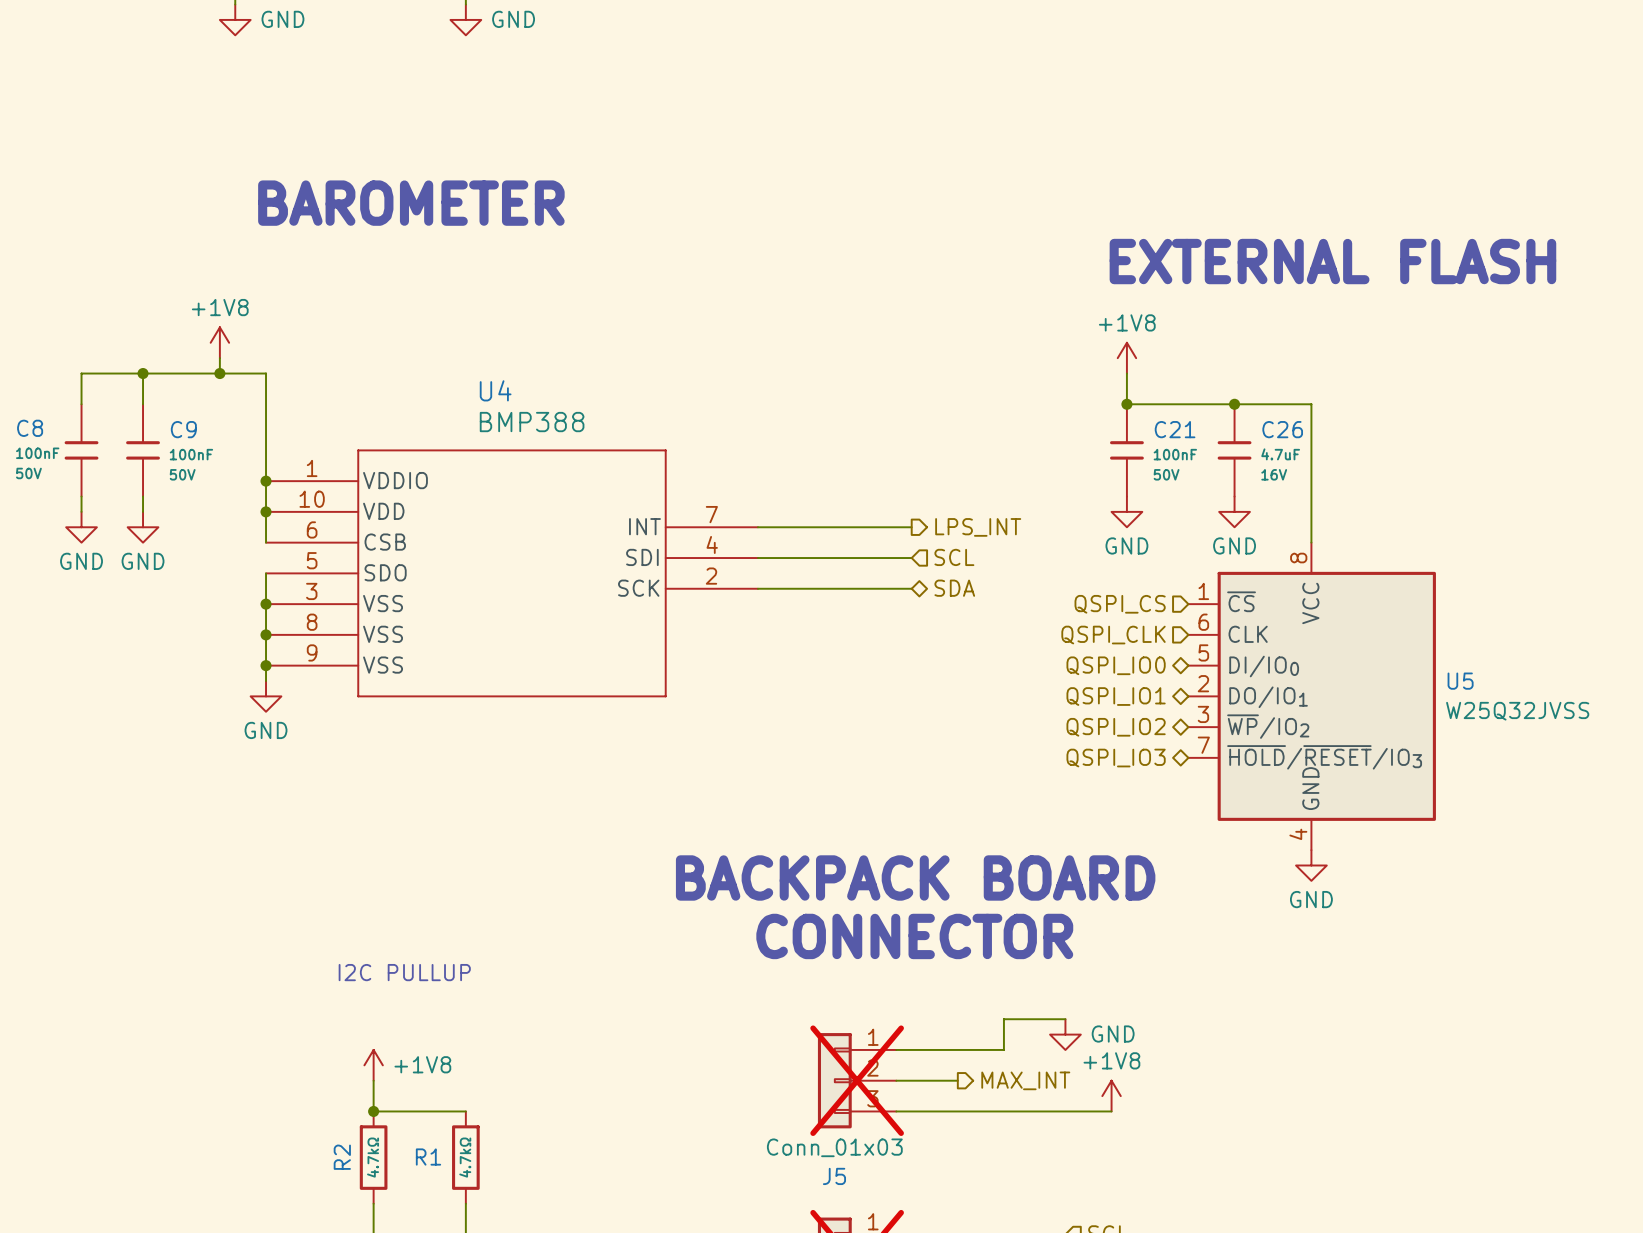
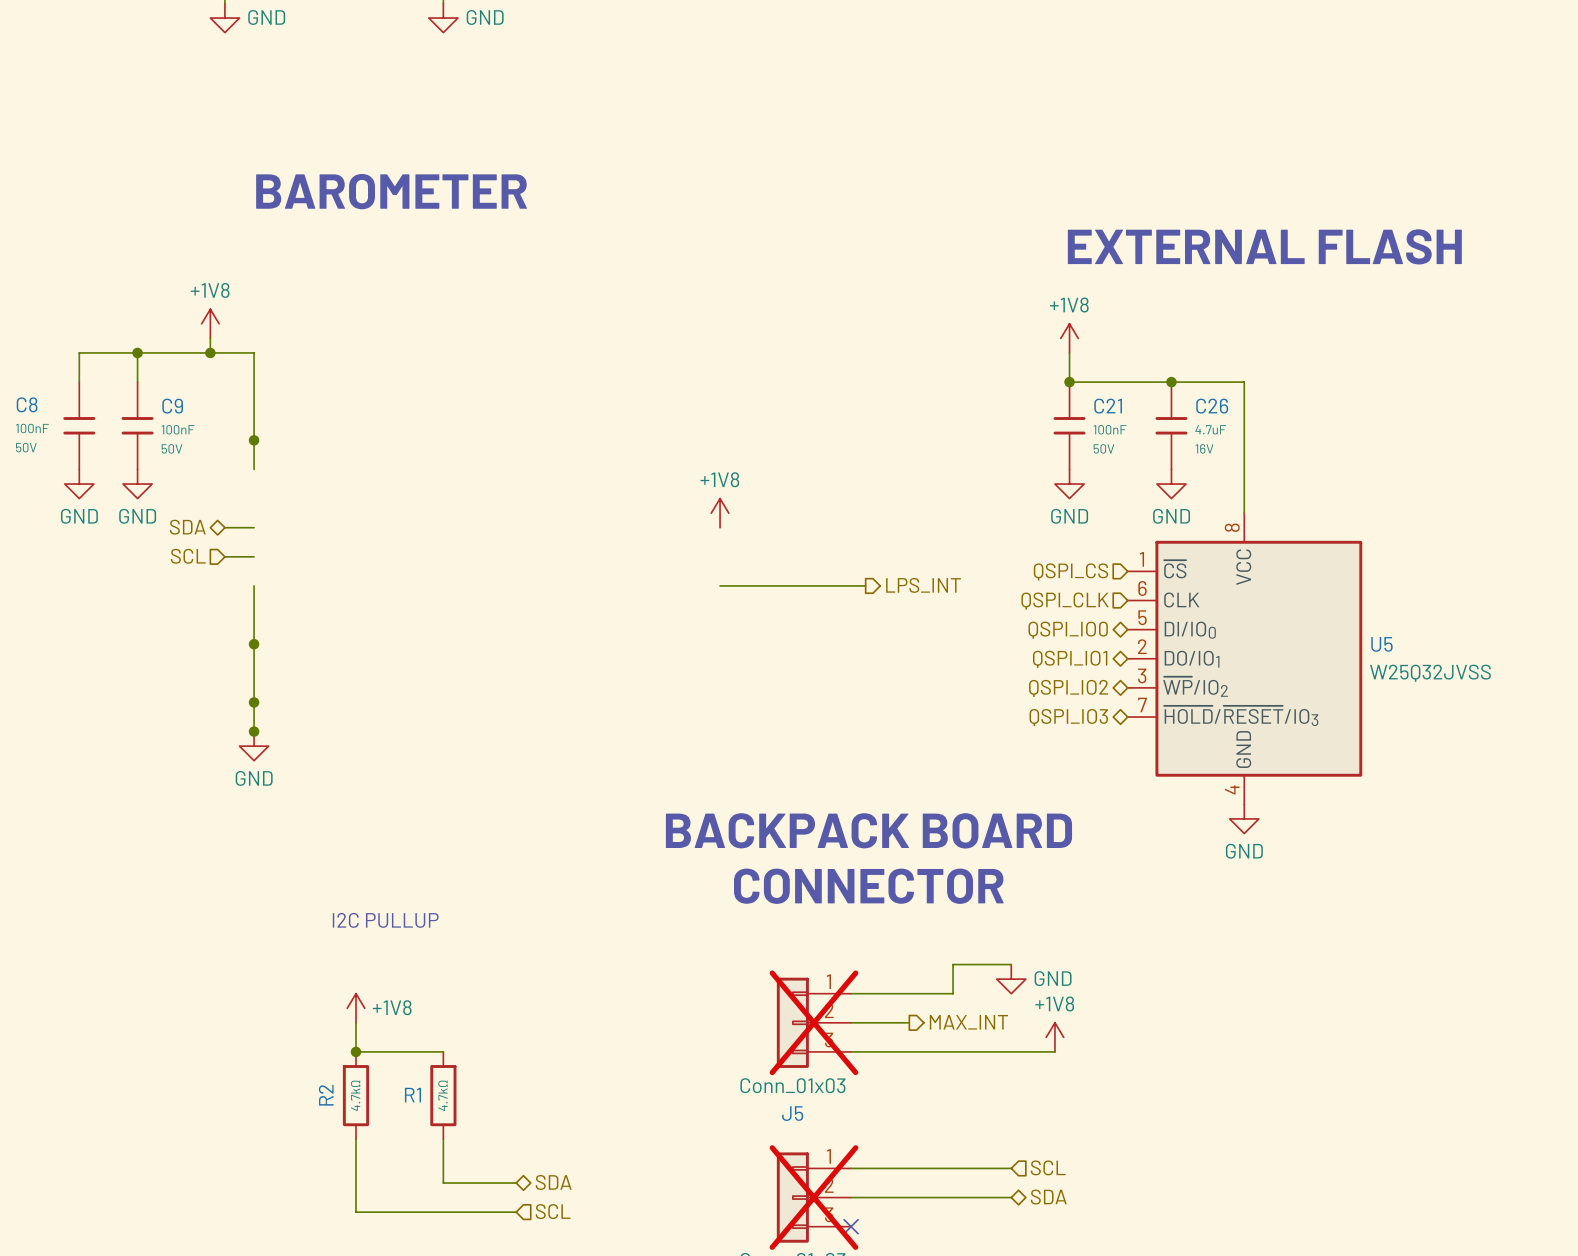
junction position: (266, 481) -> (254, 440)
wire: (266, 496) (266, 542) -> none
junction: (266, 511) -> none
power symbol position: GND (81, 527) -> GND (79, 484)
power symbol position: GND (143, 527) -> GND (137, 484)
wire: (757, 527) (911, 527) -> none
hierarchical label position: LPS_INT (978, 527) -> LPS_INT (923, 585)
power symbol: none -> +1V8 (720, 513)
hierarchical label: none -> SDA (187, 527)
hierarchical label: SCL (954, 557) -> none
wire: none -> (224, 527) (254, 527)
wire: (757, 558) (911, 558) -> none
wire: (266, 573) (266, 619) -> none
U4: BMP388 (511, 573) -> none
hierarchical label: none -> SCL (188, 556)
wire: none -> (224, 556) (254, 556)
wire: (757, 588) (911, 588) -> (720, 585) (865, 585)
hierarchical label: SDA (954, 588) -> none
junction: (266, 604) -> none
junction: (266, 634) -> none
junction position: (266, 665) -> (254, 644)
wire: none -> (254, 644) (254, 731)
power symbol position: GND (266, 696) -> GND (254, 746)
junction: none -> (254, 702)
junction: none -> (254, 731)

